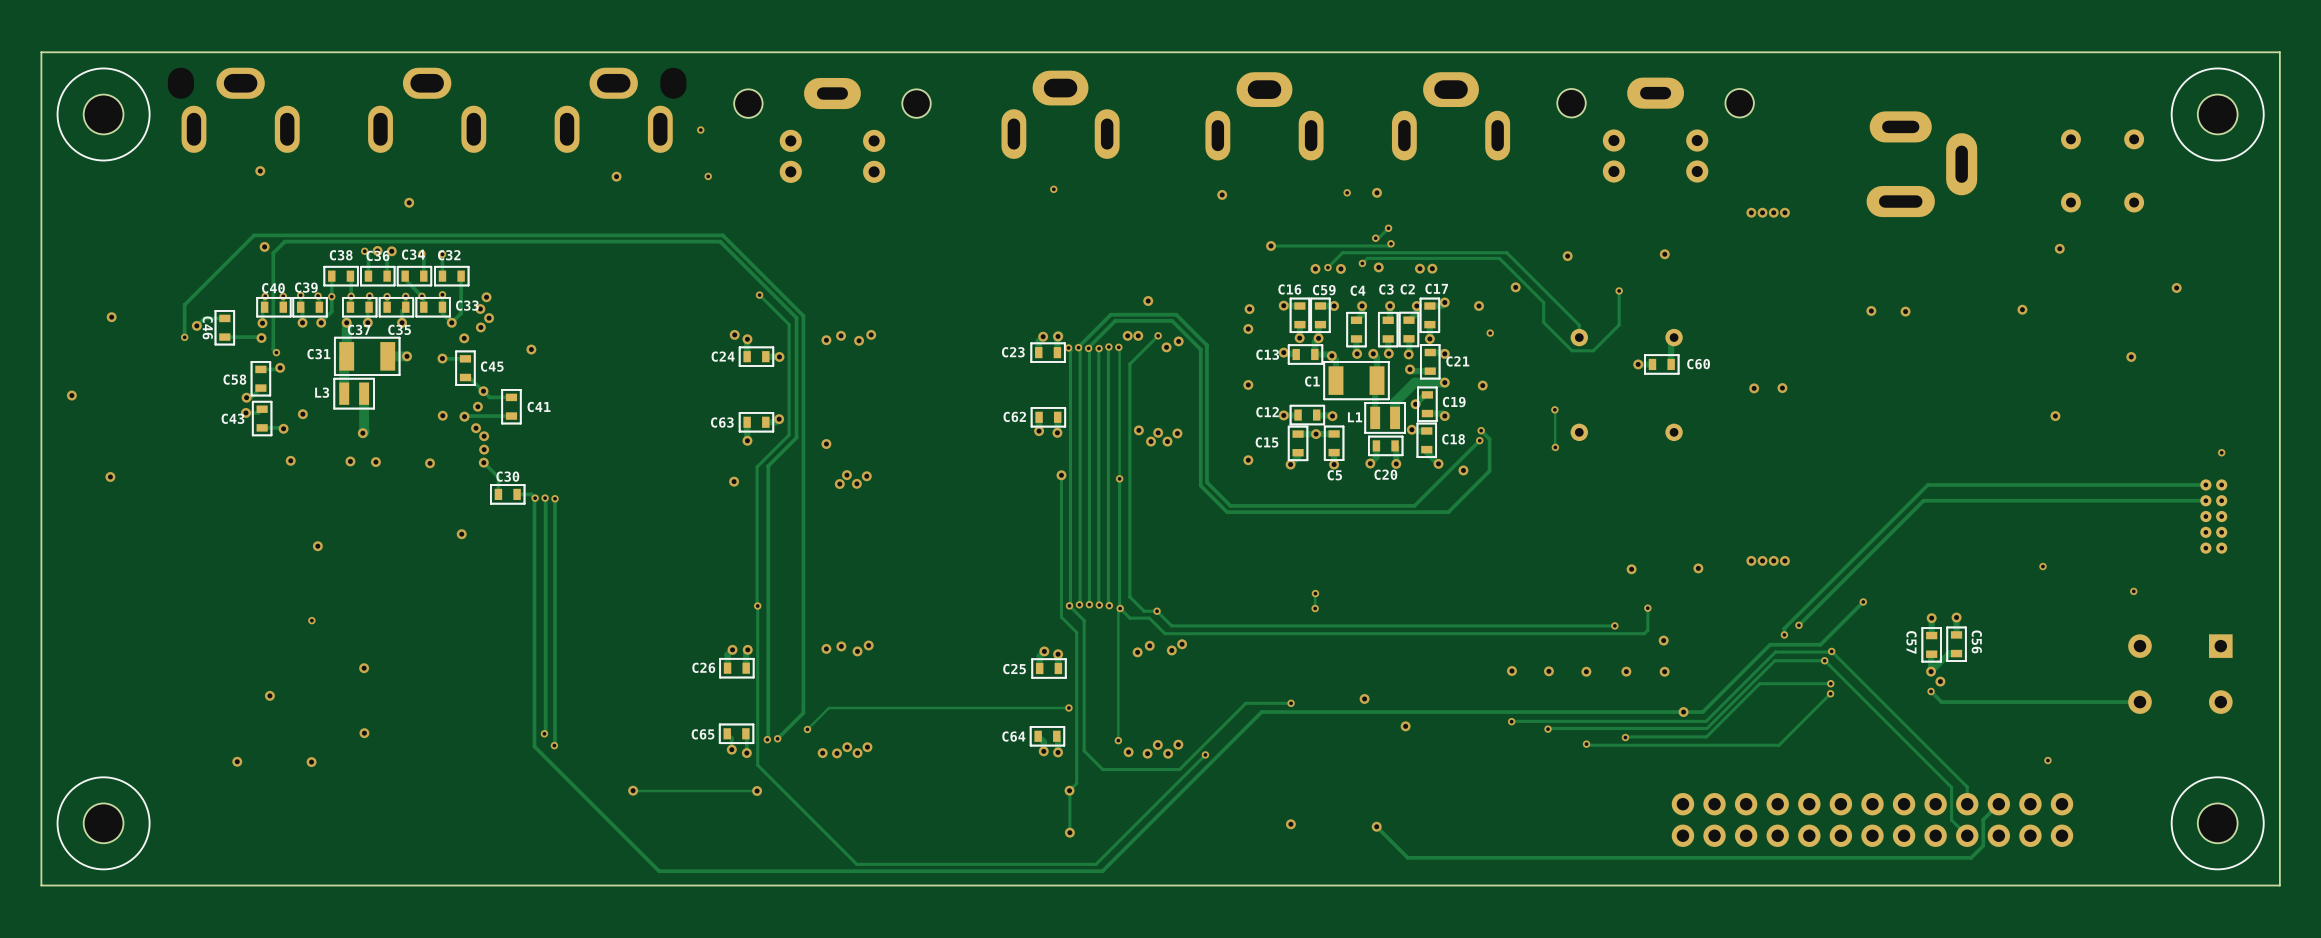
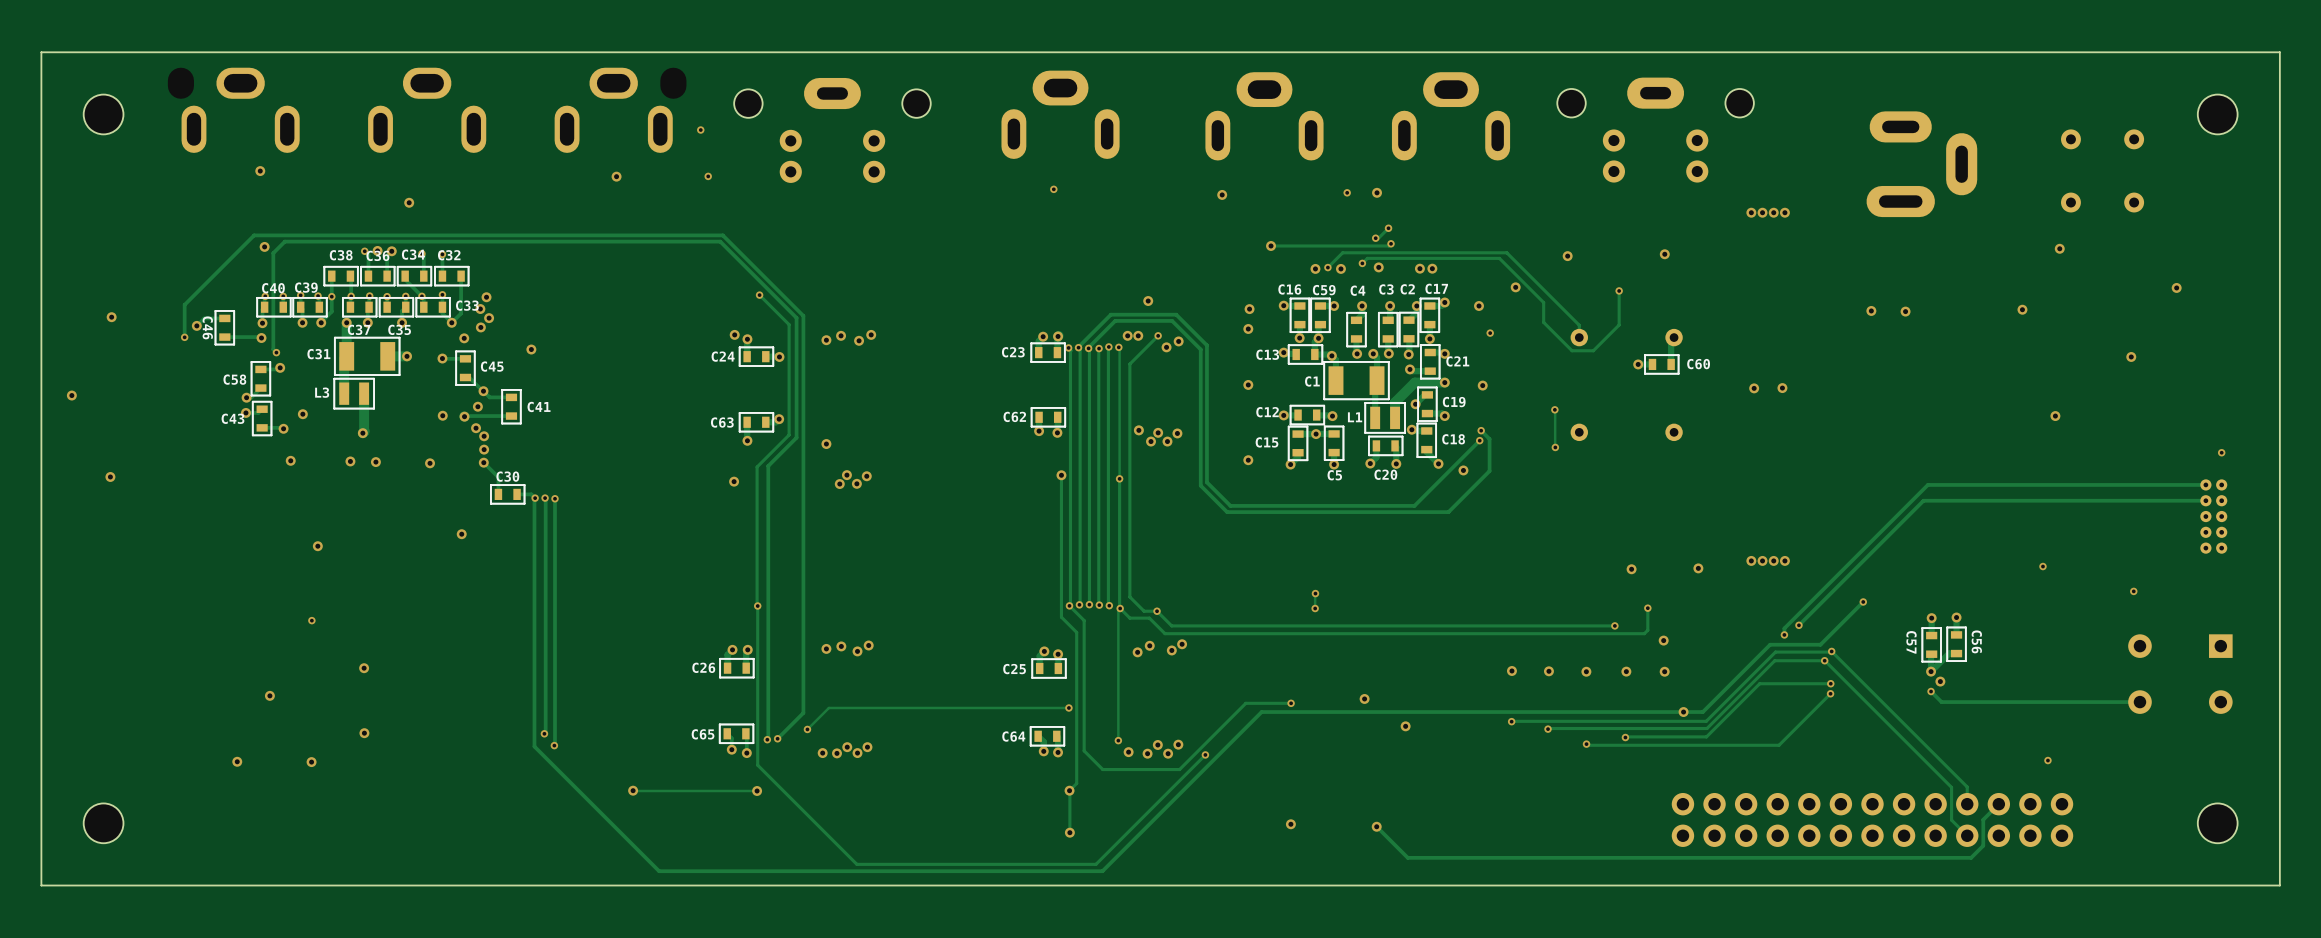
part footprint: [56, 67, 151, 162] -> [83, 94, 124, 135]
part footprint: [2170, 67, 2265, 162] -> [2197, 94, 2238, 135]
part footprint: [56, 776, 151, 871] -> [83, 803, 124, 844]
part footprint: [2170, 776, 2265, 871] -> [2197, 803, 2238, 844]

